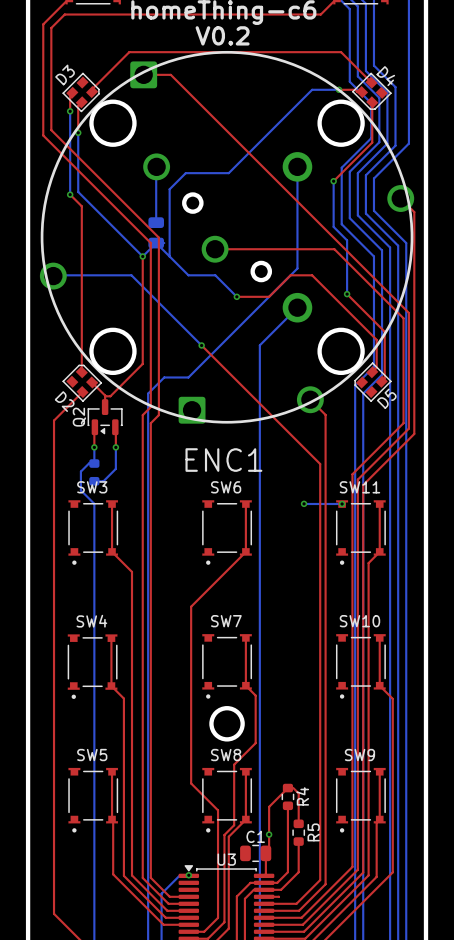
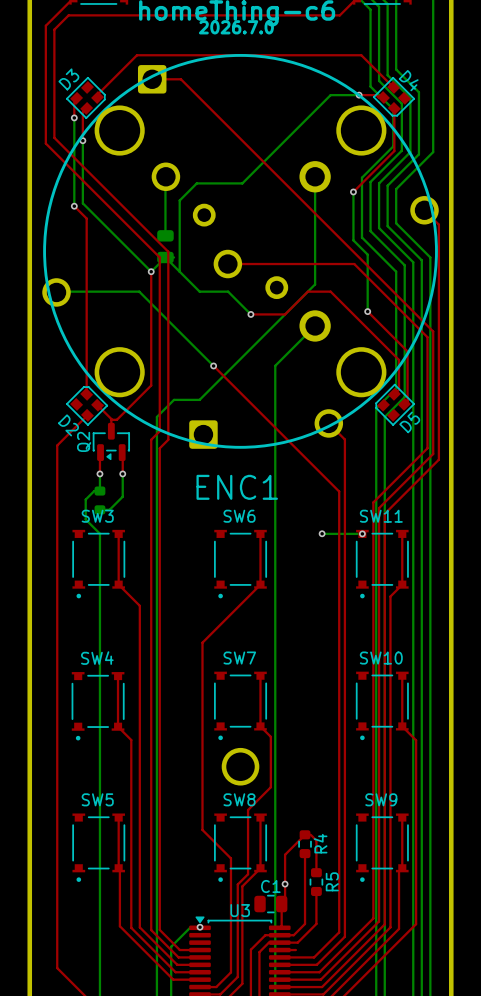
text: V0.2 (222, 35) -> 2026.7.0 (236, 27)

